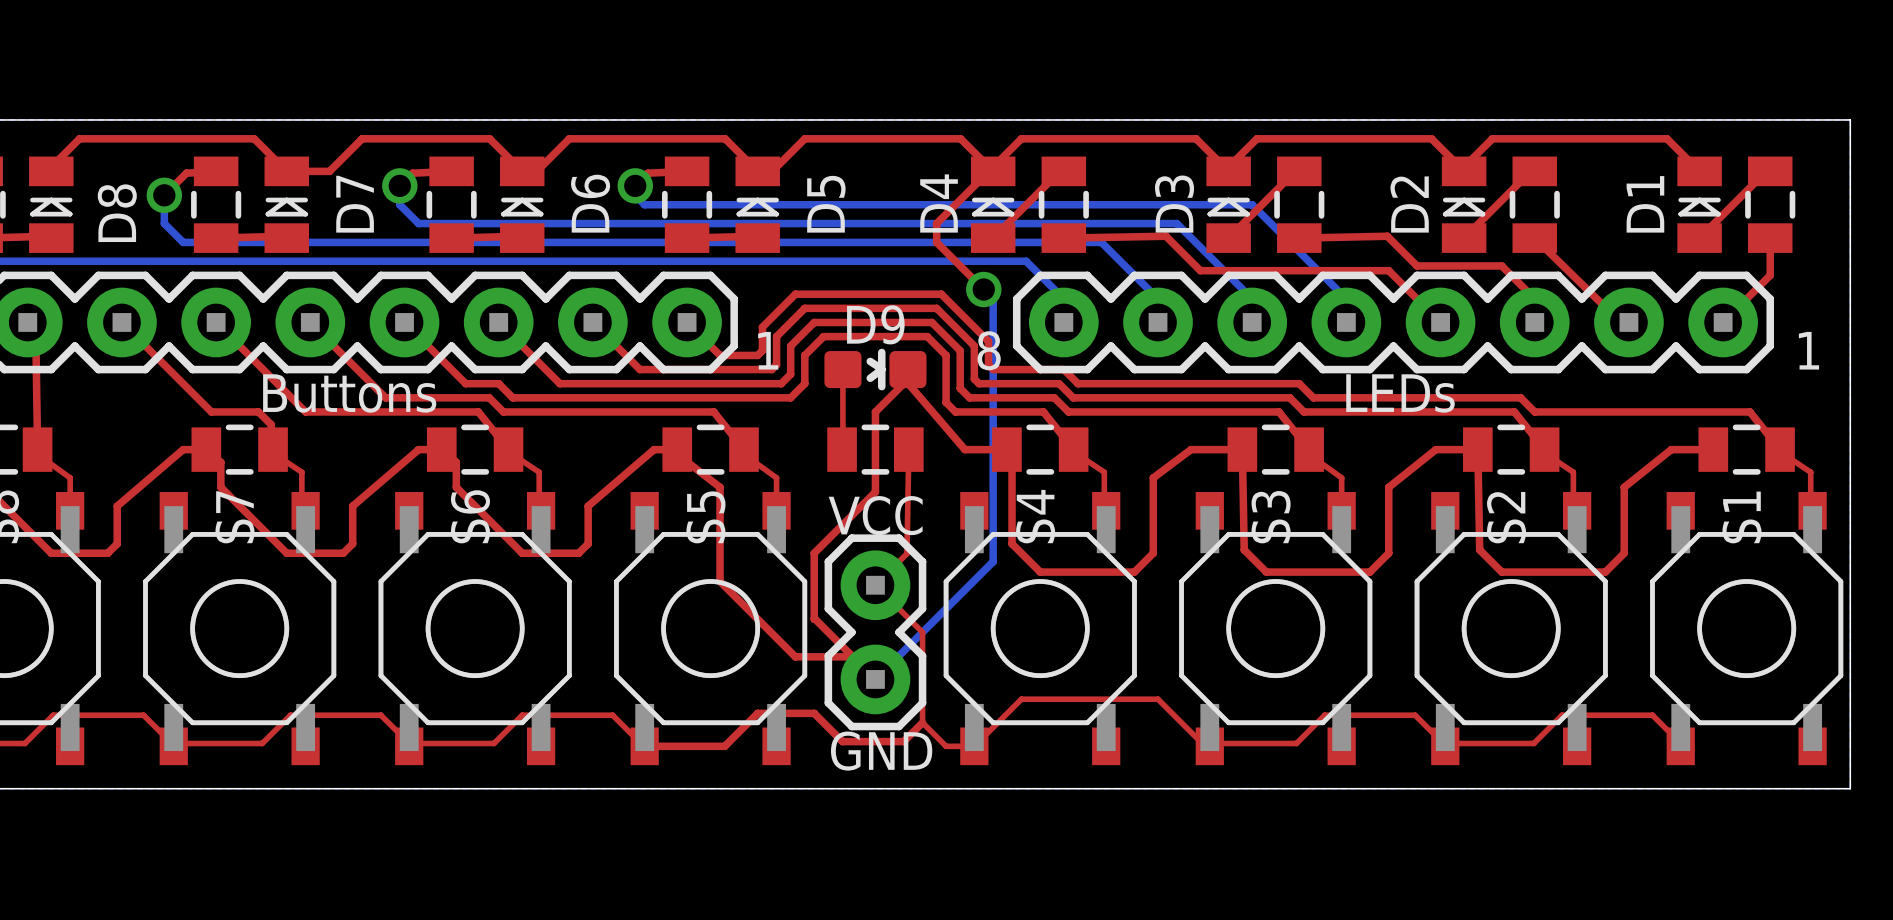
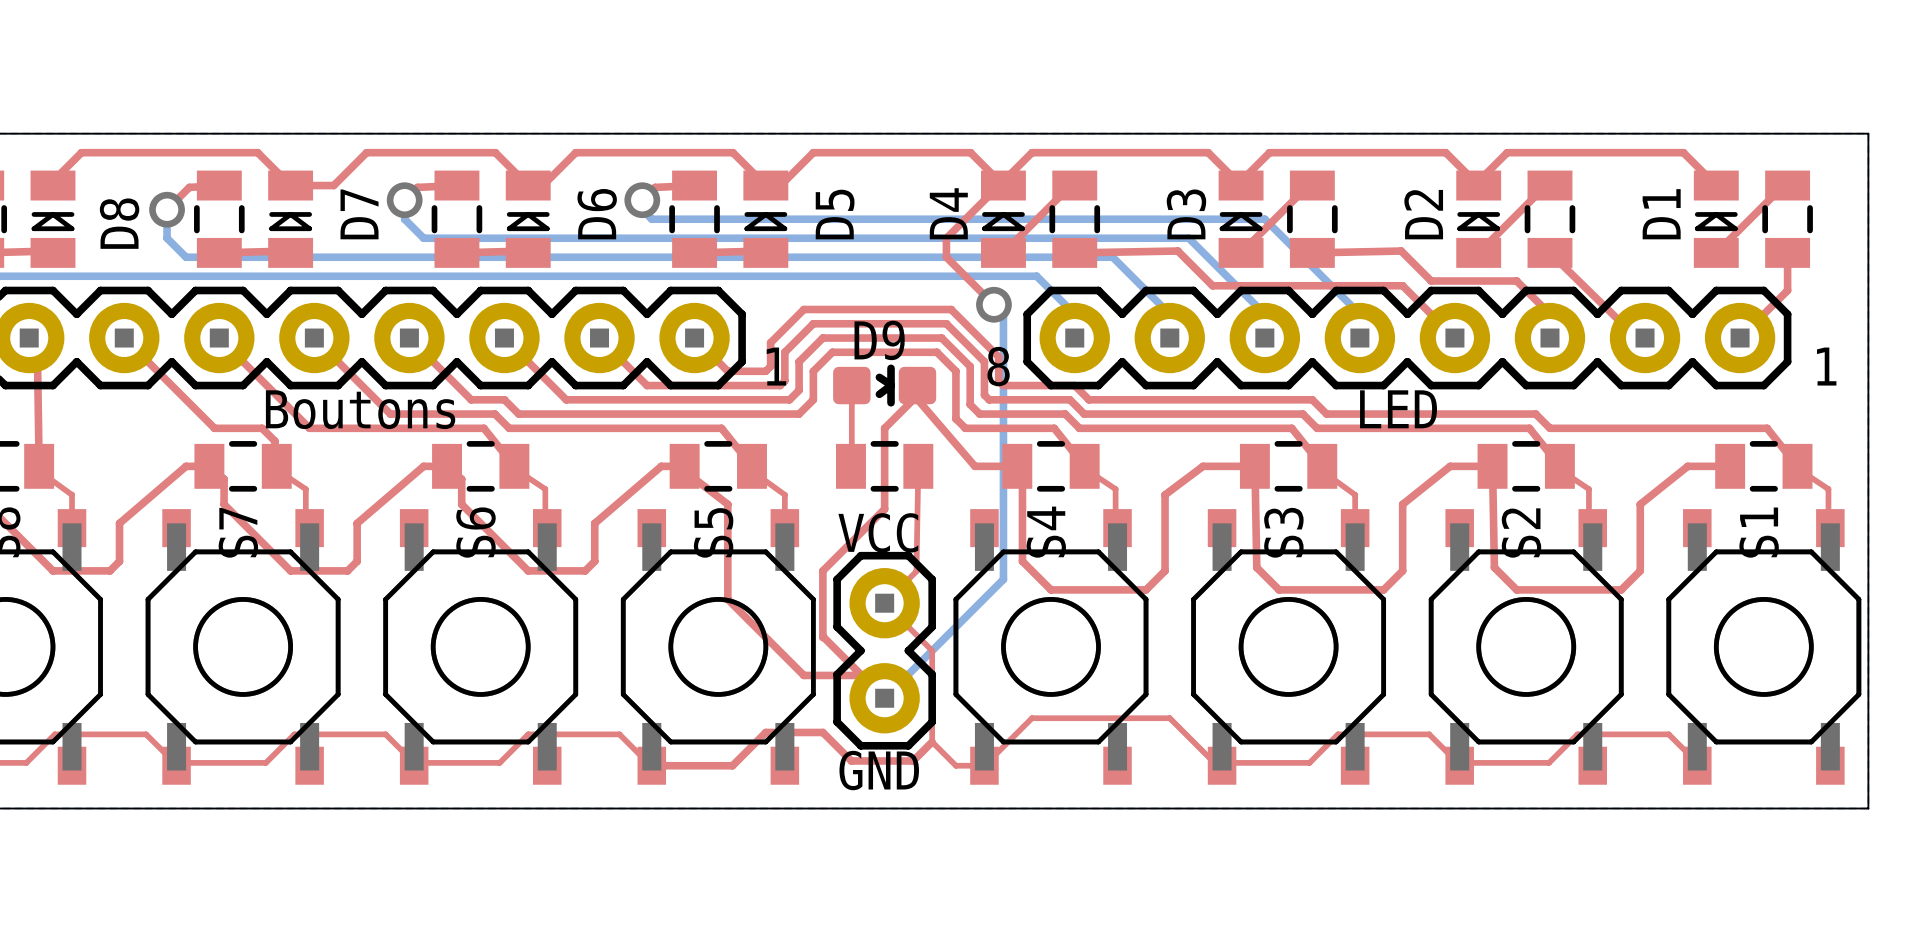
text: Buttons (349, 393) -> Boutons (360, 409)
text: LEDs (1400, 393) -> LED (1398, 409)

